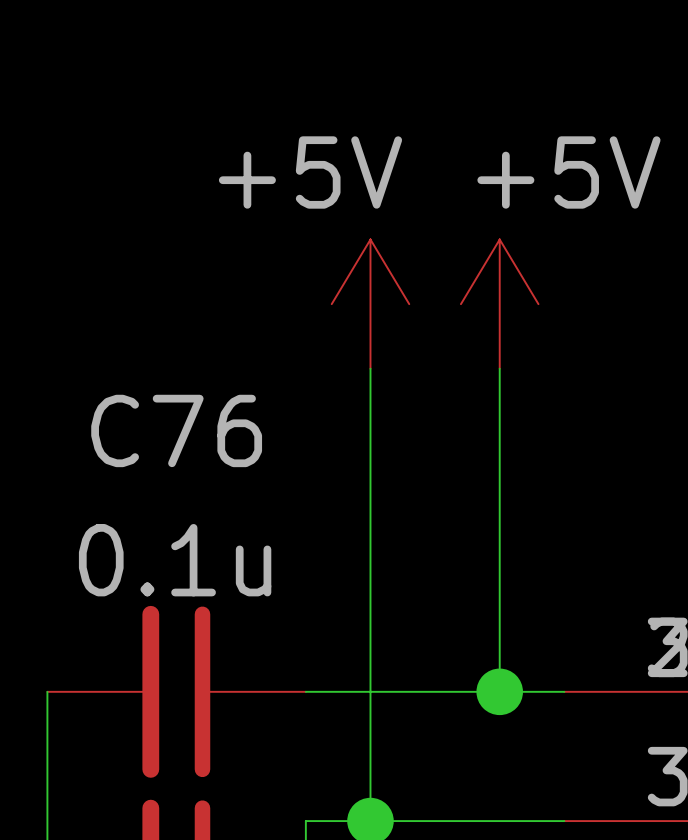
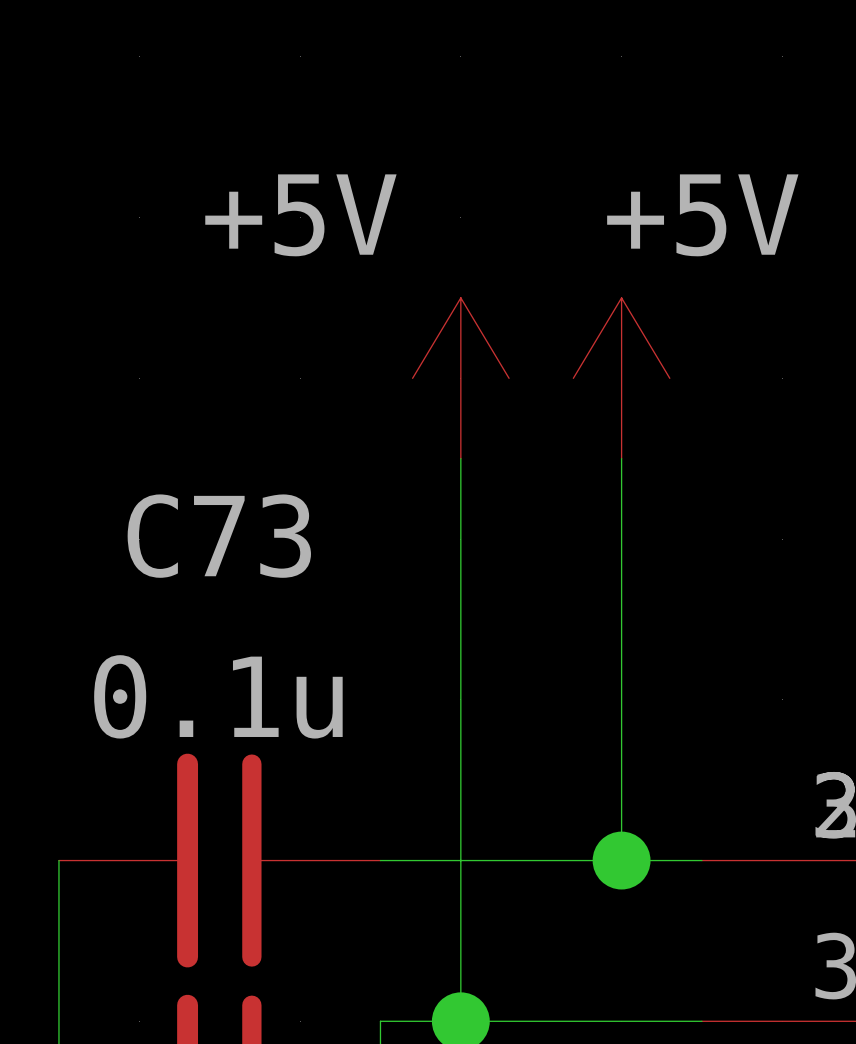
power symbol text position: +5V (310, 172) -> +5V (300, 215)
C76 name: C76 (176, 430) -> C73 (219, 536)

